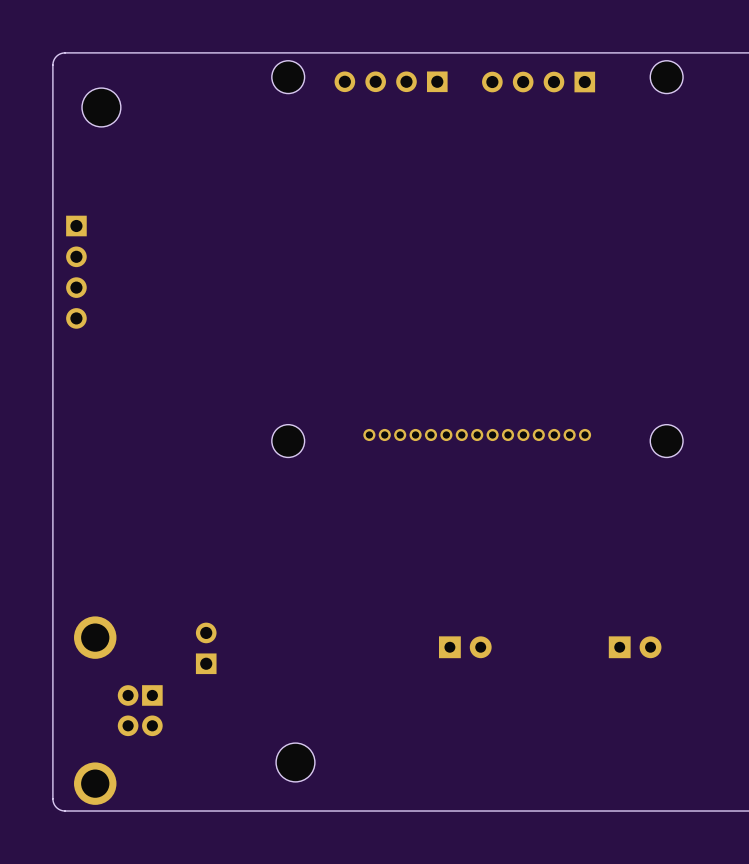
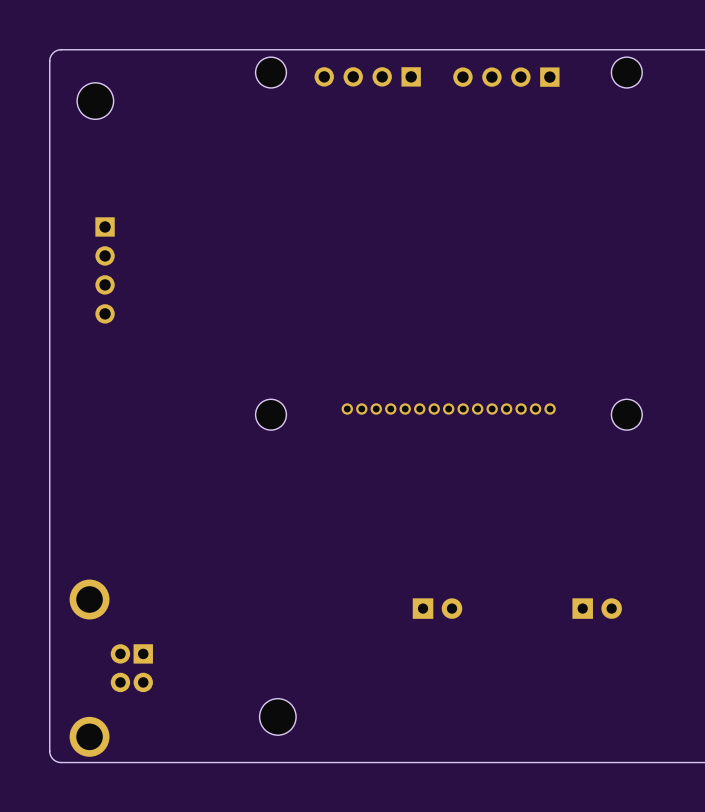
part position: (76, 272) -> (105, 270)
part: (206, 648) -> none

